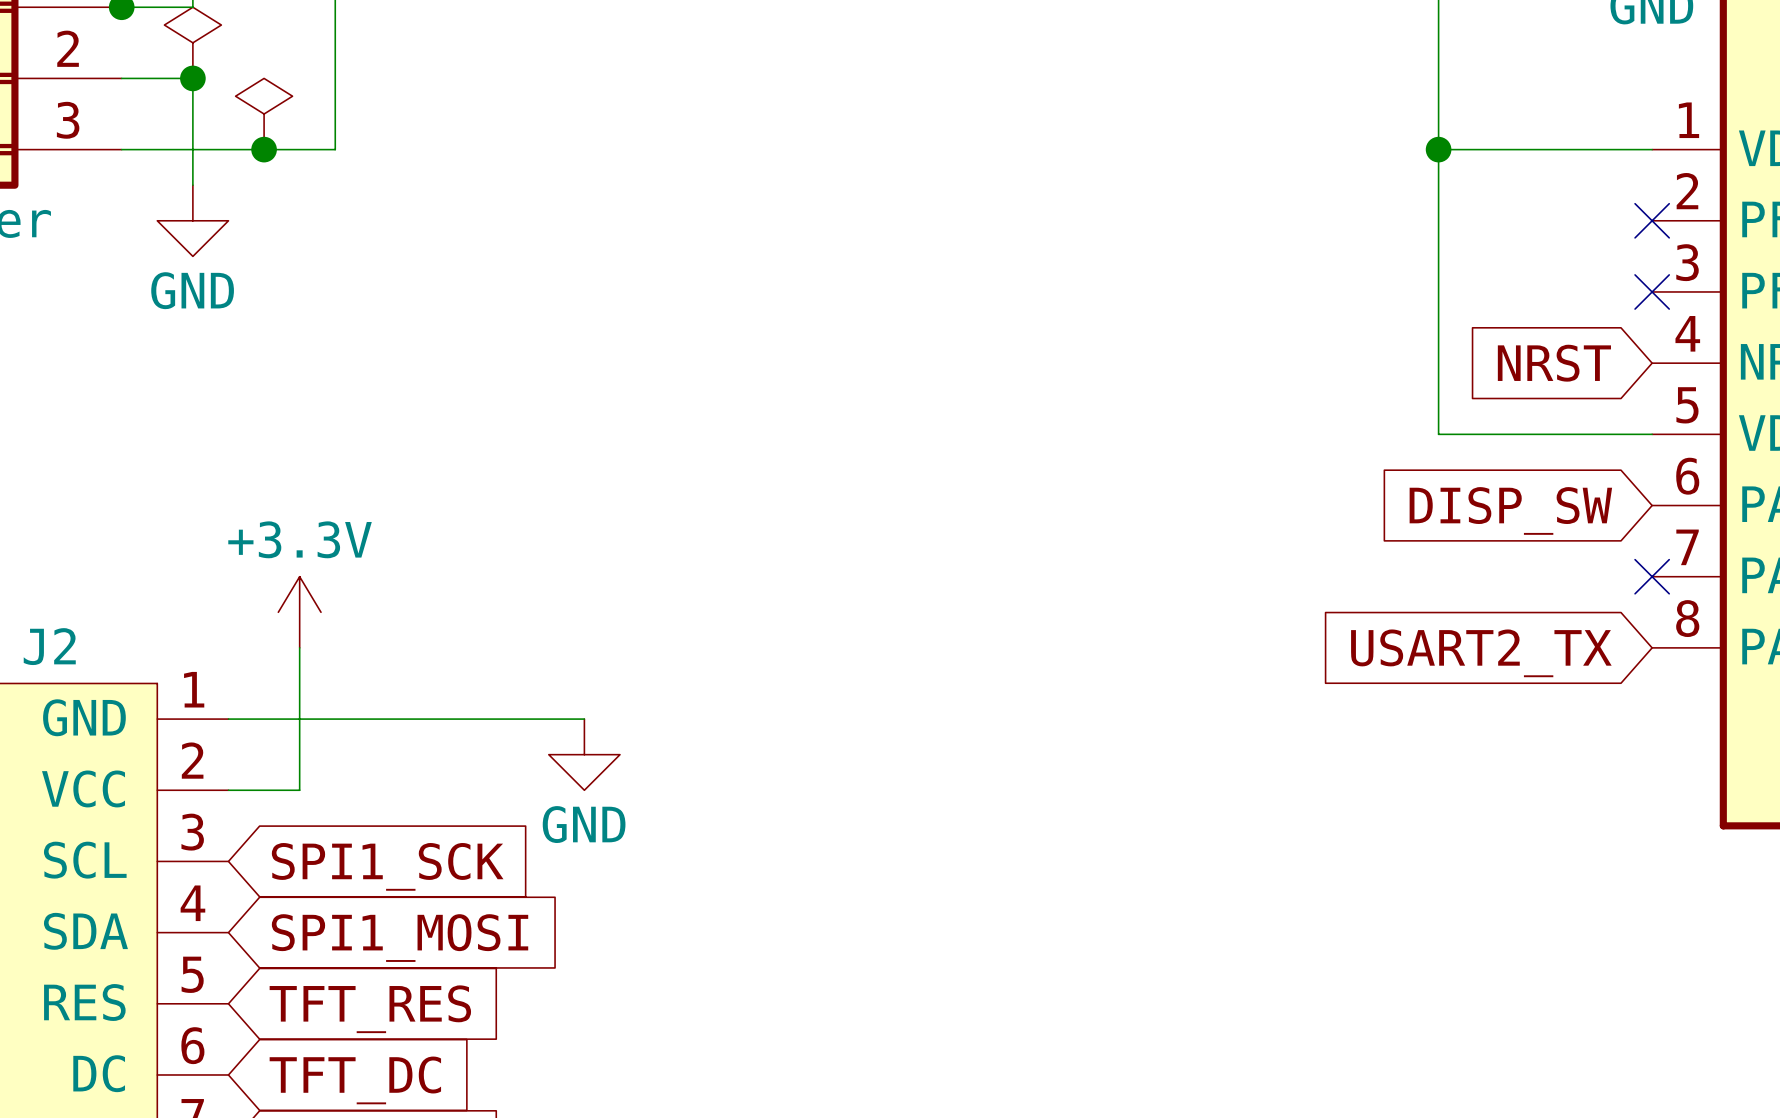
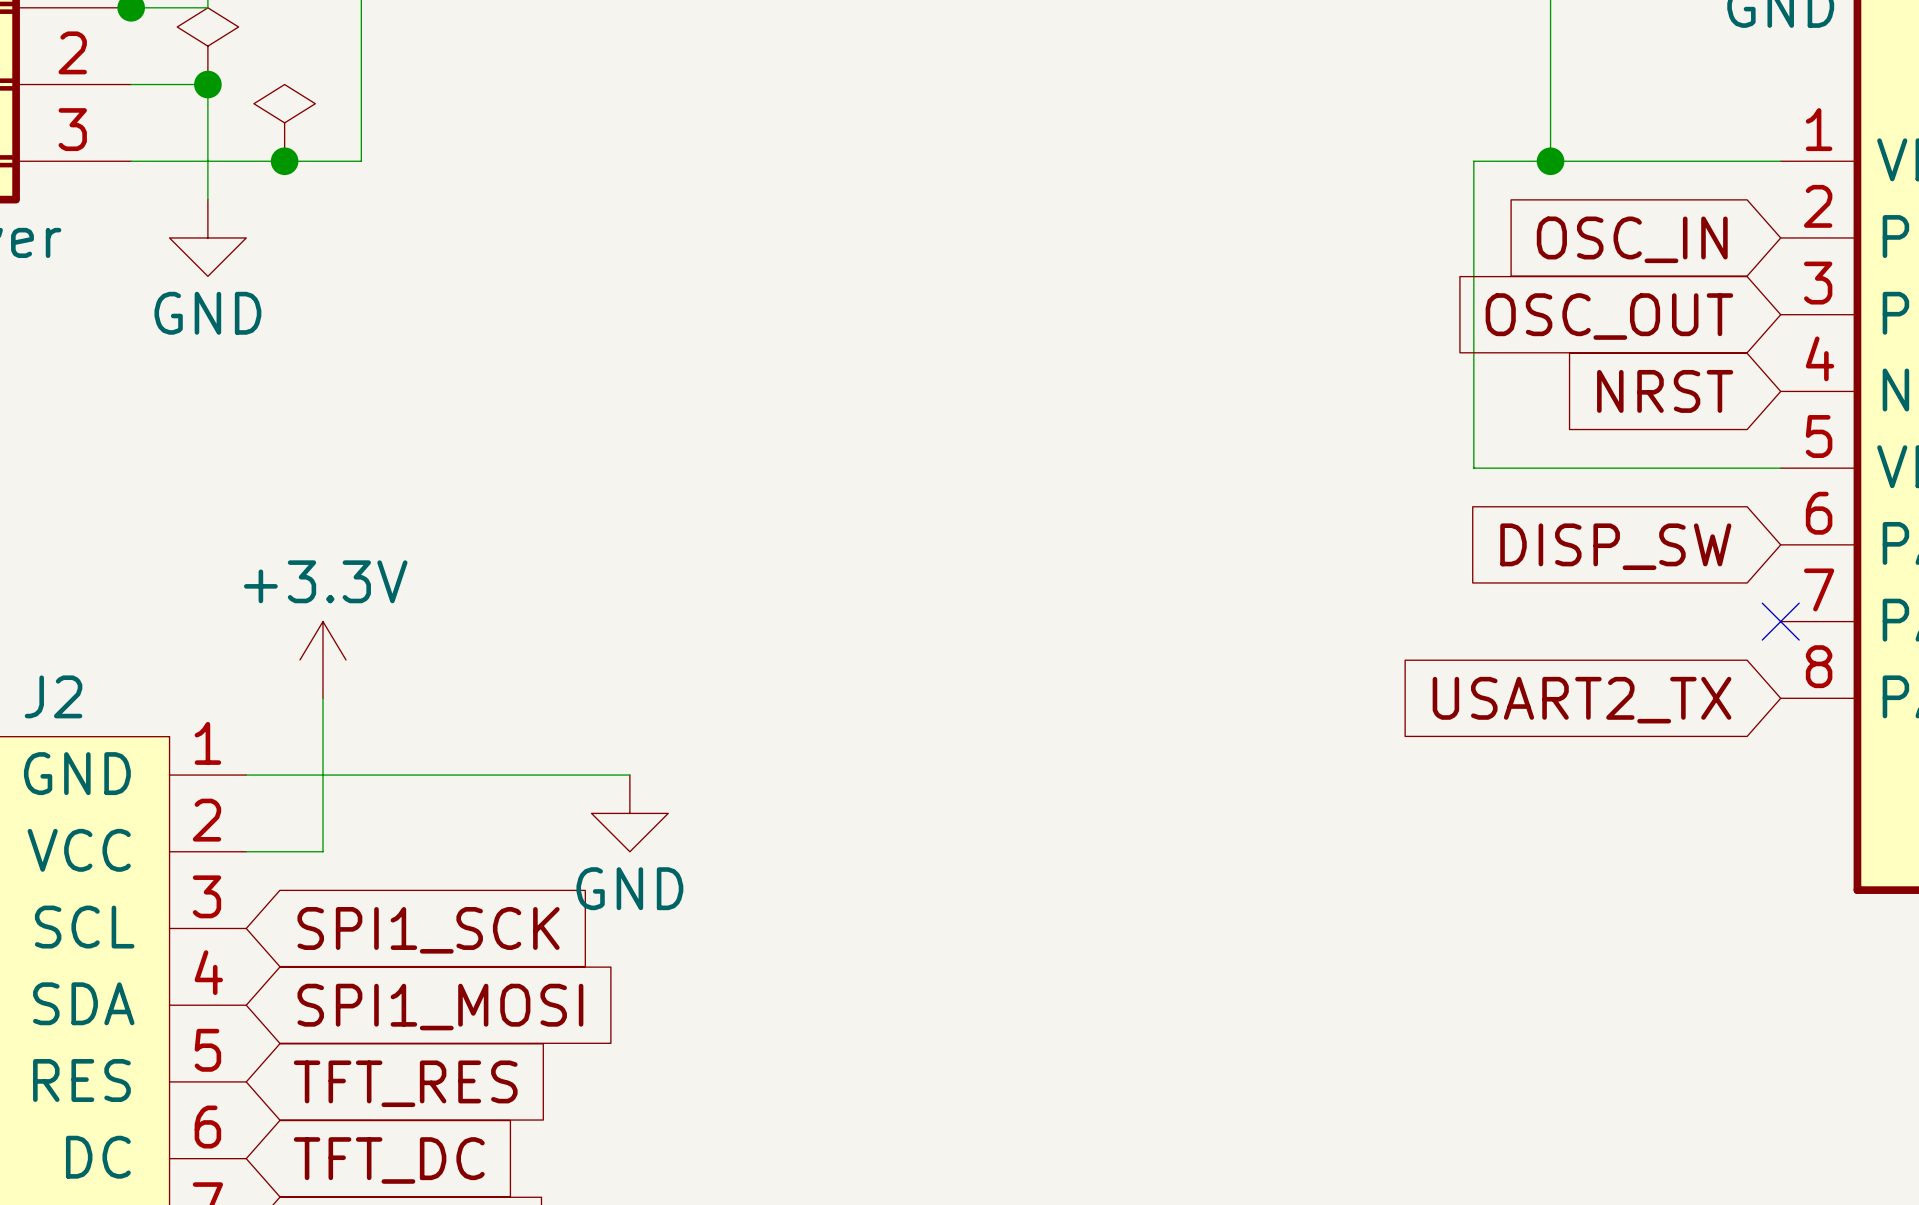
wire: (1438, 149) (1438, 434) -> (1550, 161) (1473, 161) (1473, 468) (1550, 468)
no-connect mark: (1652, 220) -> none
global label: none -> OSC_IN (1632, 239)
no-connect mark: (1652, 291) -> none
global label: none -> OSC_OUT (1609, 316)

